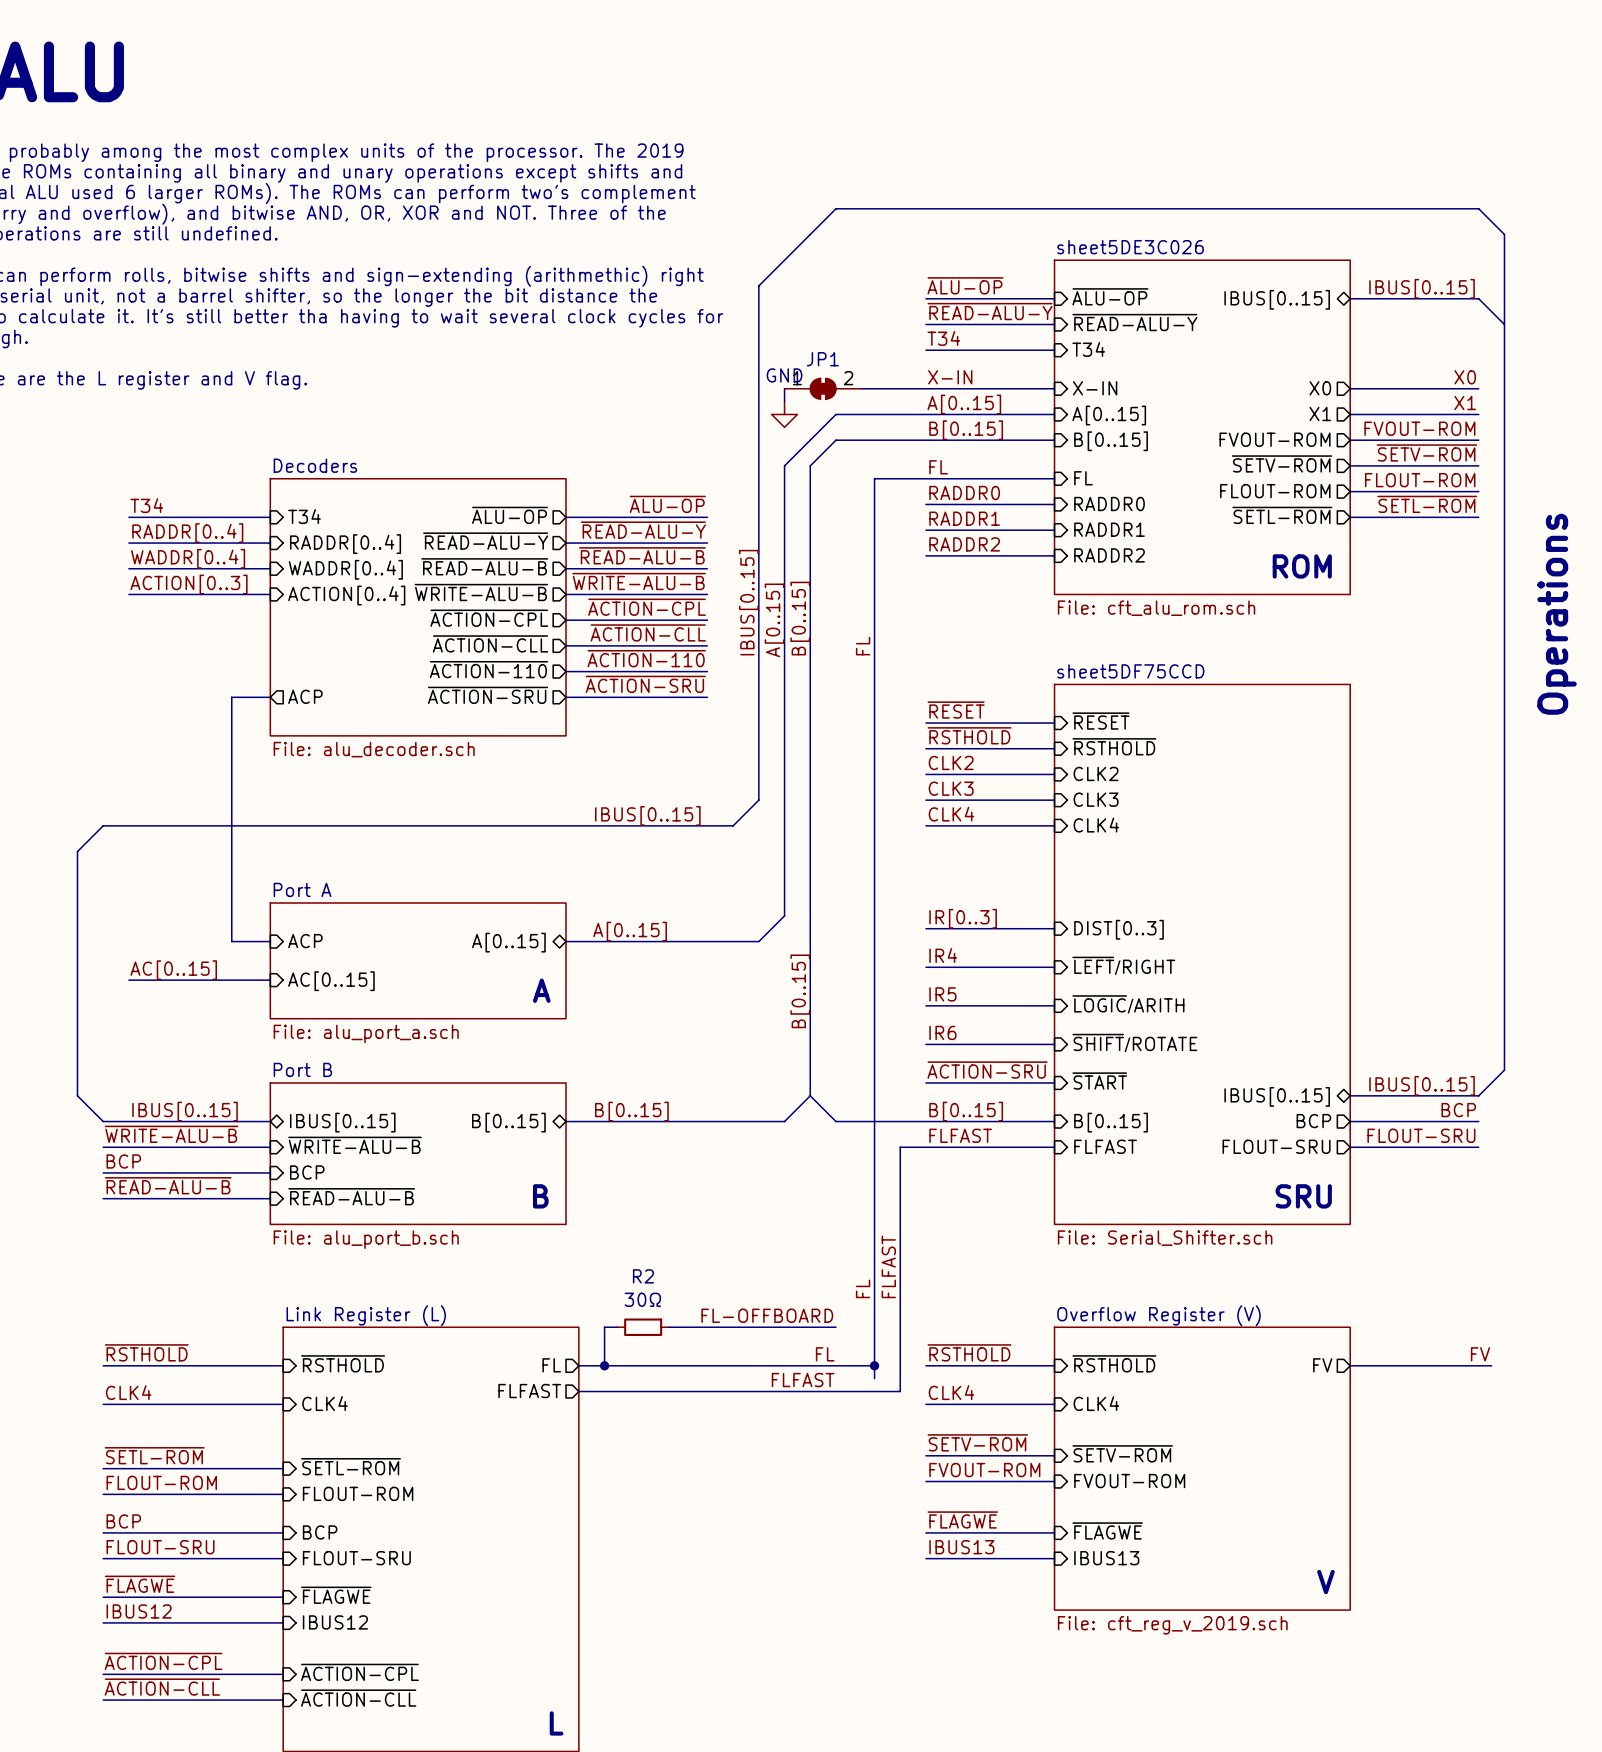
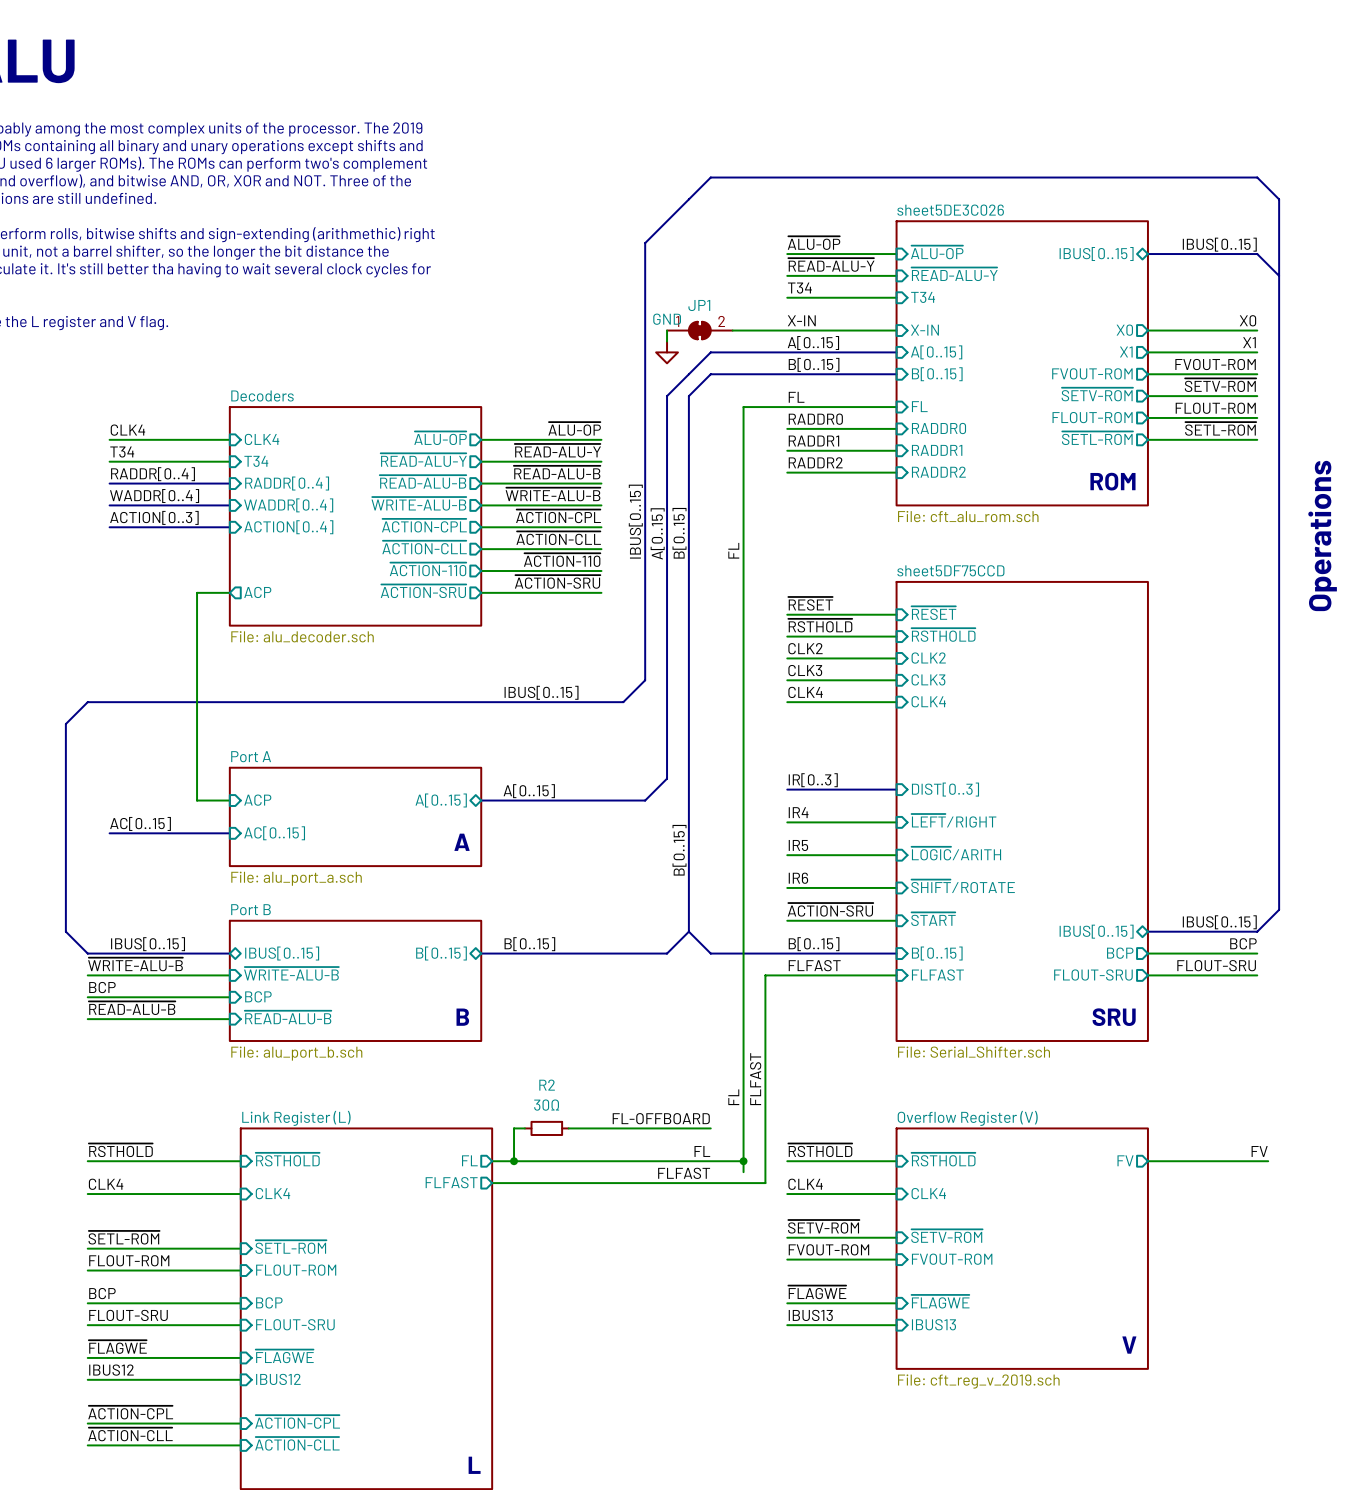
label: T34 (146, 505) -> CLK4 (127, 430)
sheet pin: T34 (304, 516) -> CLK4 (262, 439)
label: RADDR[0..4] (187, 533) -> T34 (122, 452)
bus: (128, 543) (270, 543) -> (109, 527) (229, 527)
sheet pin: RADDR[0..4] (345, 544) -> T34 (256, 461)
label: WADDR[0..4] (188, 558) -> RADDR[0..4] (153, 474)
sheet pin: WADDR[0..4] (345, 569) -> RADDR[0..4] (287, 483)
label: ACTION[0..3] (189, 584) -> WADDR[0..4] (154, 496)
sheet pin: ACTION[0..4] (346, 595) -> WADDR[0..4] (288, 505)
label: none -> ACTION[0..3] (154, 517)
sheet pin: none -> ACTION[0..4] (288, 527)

